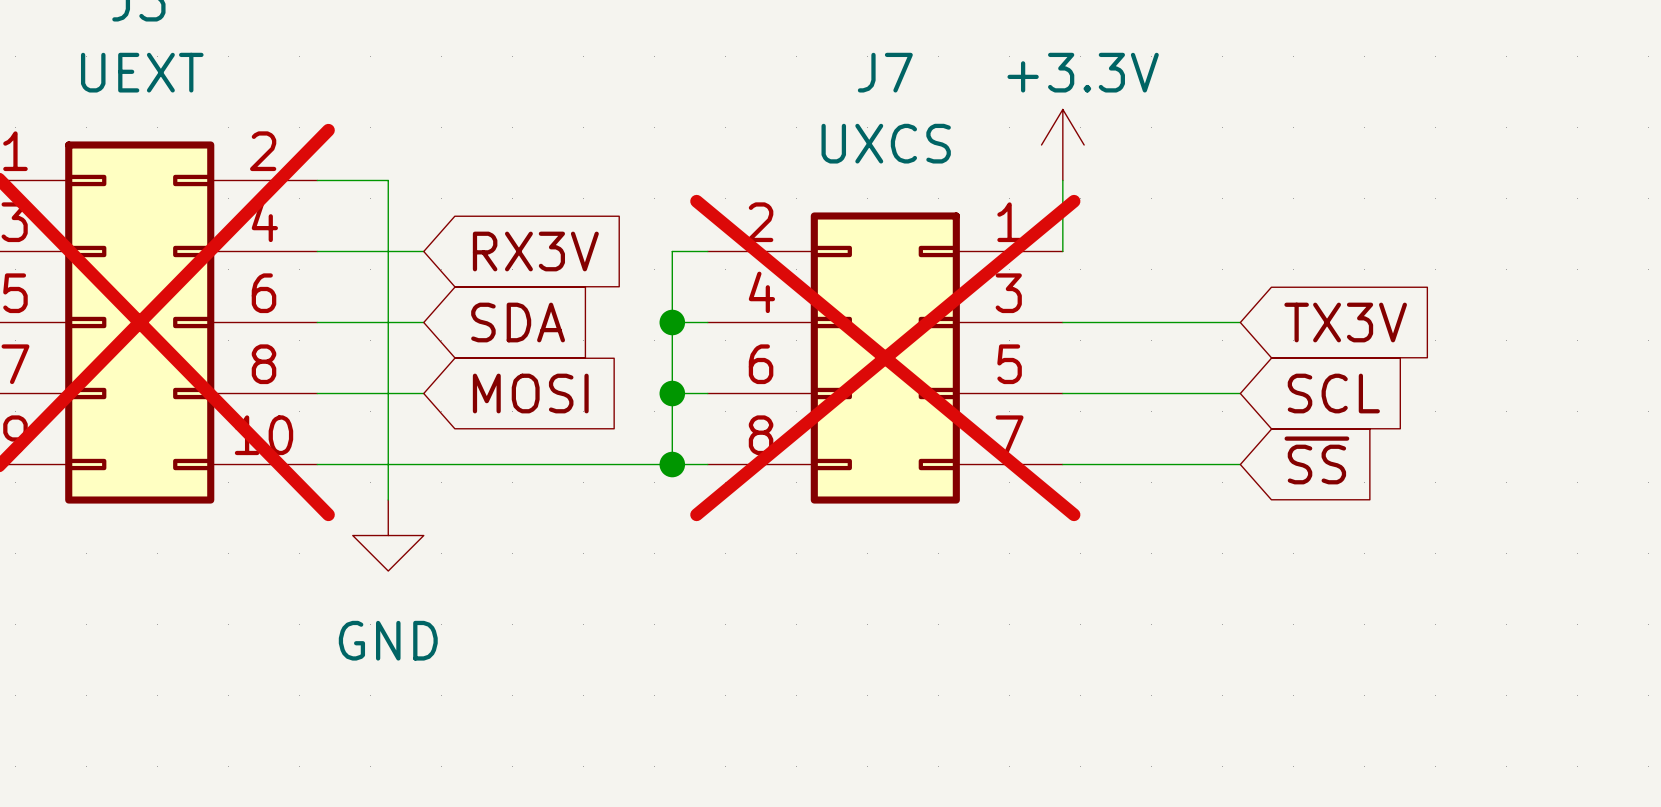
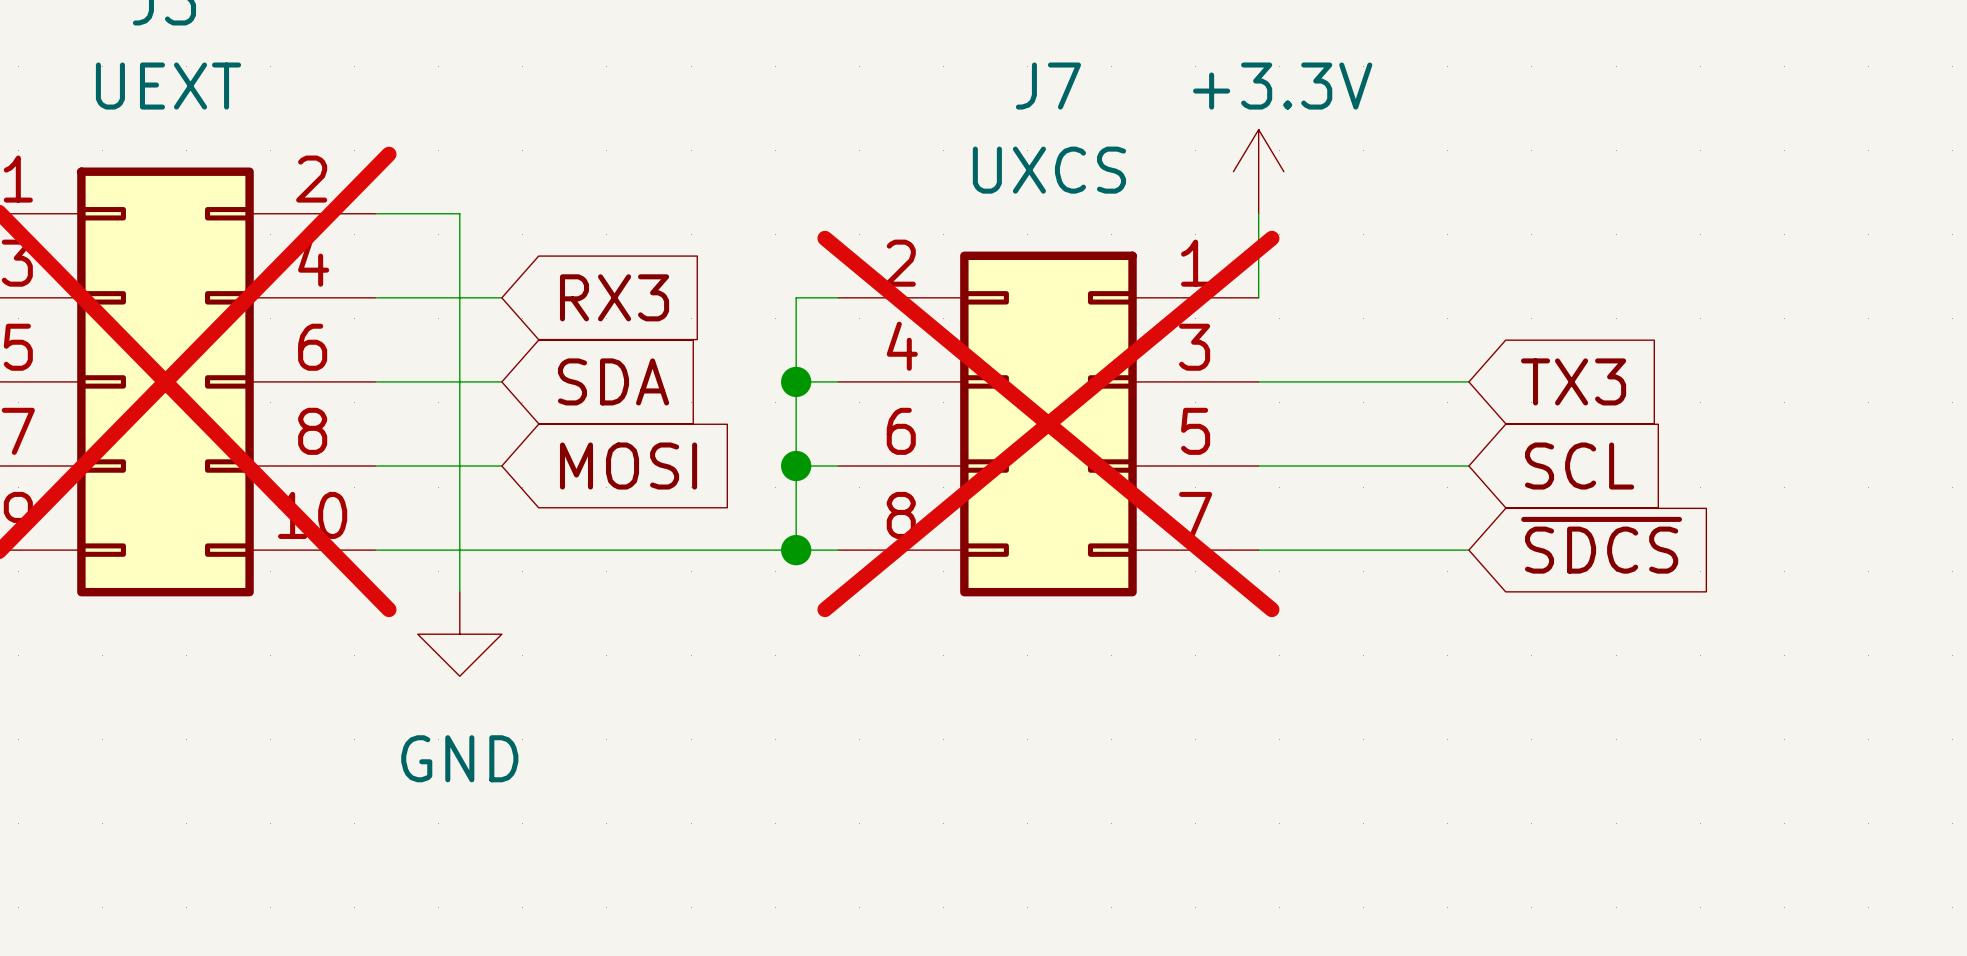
global label: RX3V (535, 251) -> RX3 (614, 297)
global label: TX3V (1345, 322) -> TX3 (1573, 381)
global label: ~{SS} (1316, 460) -> ~{SDCS} (1601, 545)

